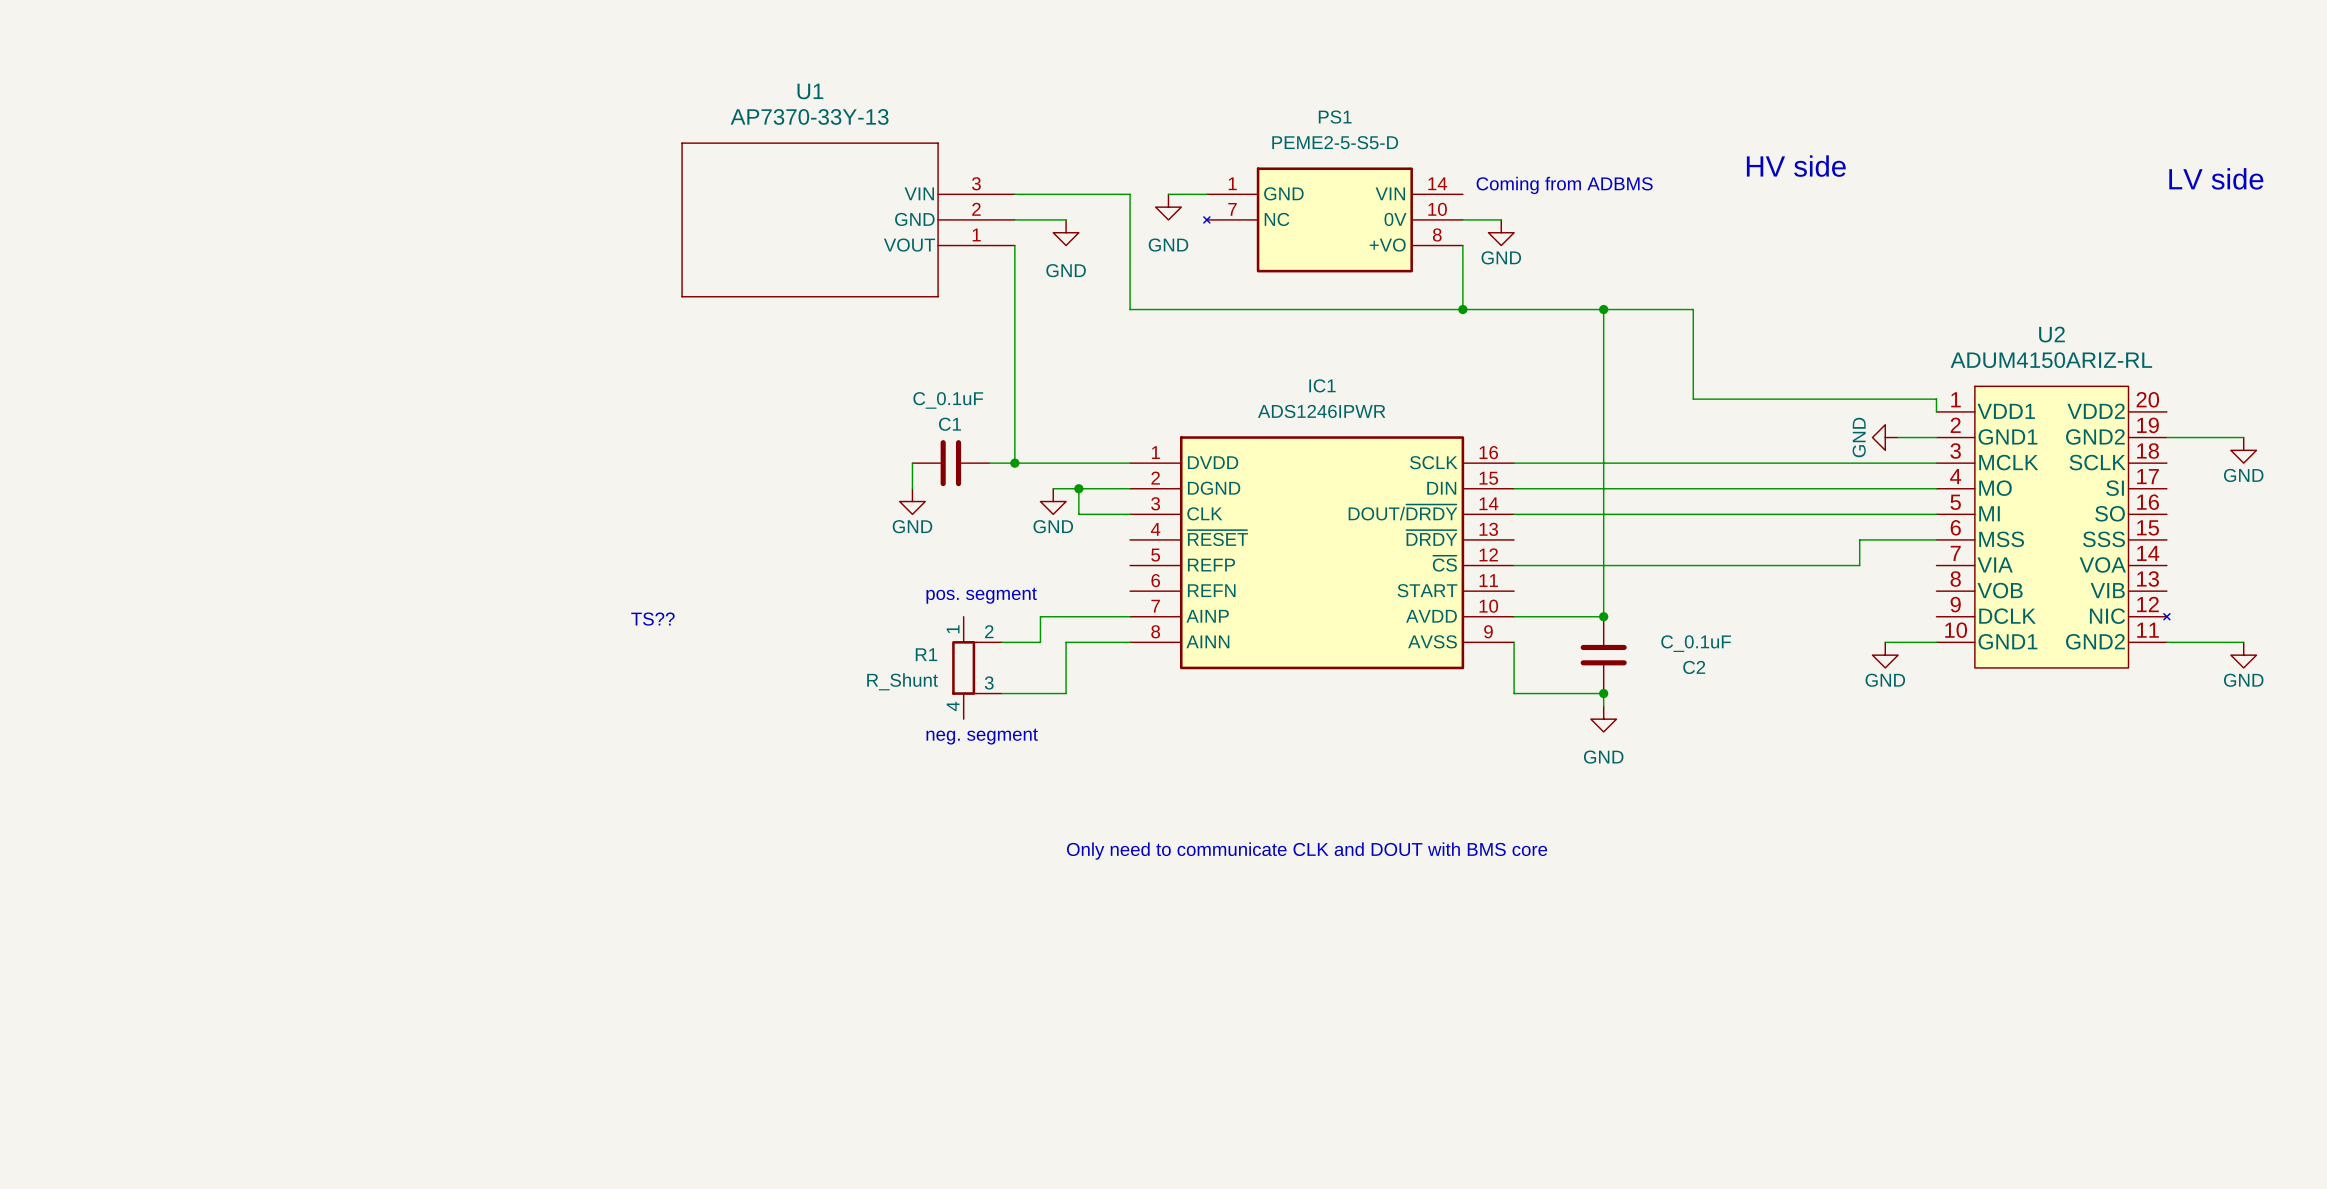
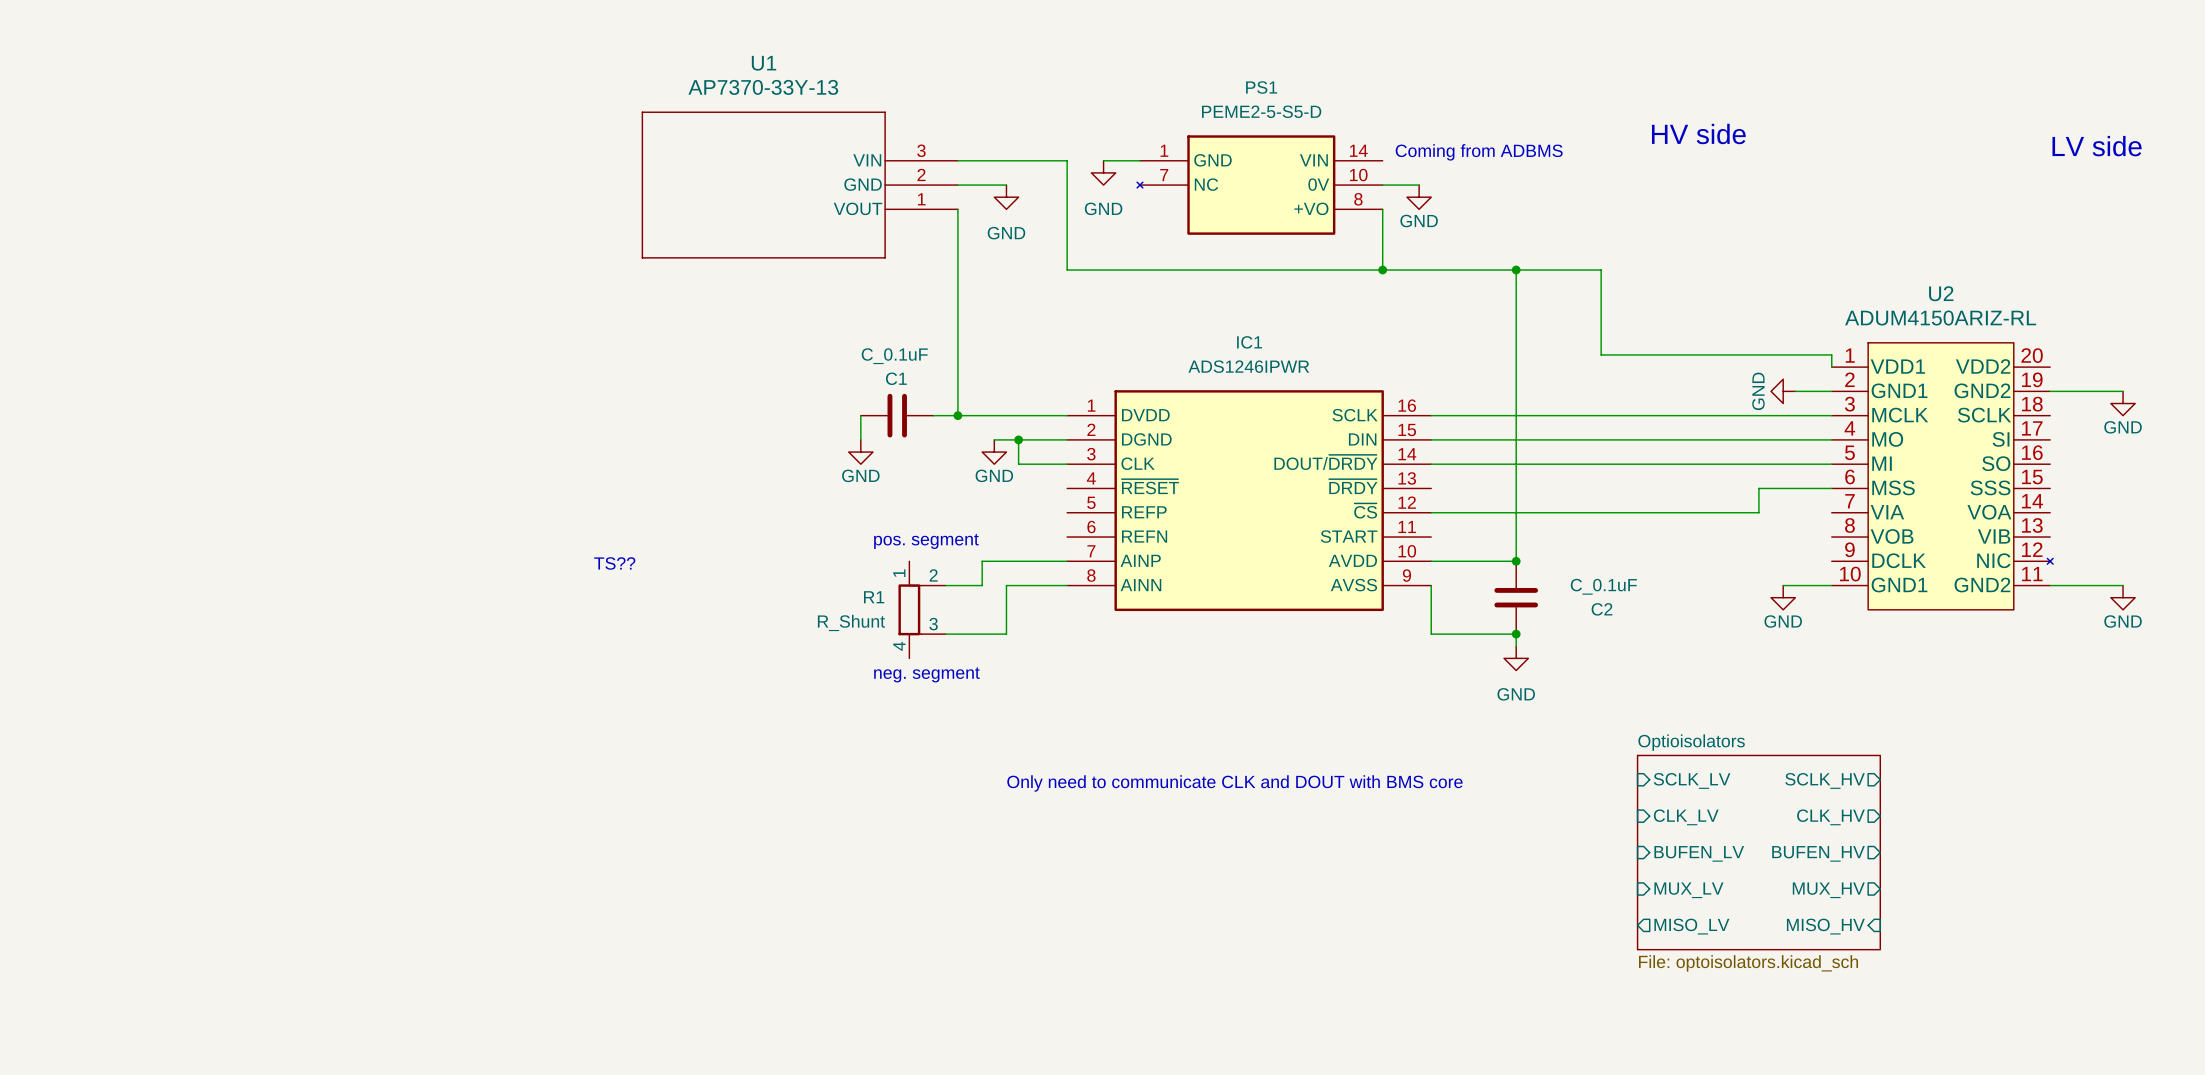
sheet pin: none -> SCLK_LV (1692, 780)
sheet pin: none -> SCLK_HV (1825, 780)
sheet pin: none -> CLK_LV (1686, 817)
sheet pin: none -> CLK_HV (1830, 817)
sheet Optioisolators: none -> File: optoisolators.kicad_sch (1758, 852)
sheet pin: none -> BUFEN_LV (1699, 853)
sheet pin: none -> BUFEN_HV (1818, 853)
sheet pin: none -> MUX_LV (1688, 890)
sheet pin: none -> MUX_HV (1828, 890)
sheet pin: none -> MISO_LV (1691, 926)
sheet pin: none -> MISO_HV (1825, 926)

